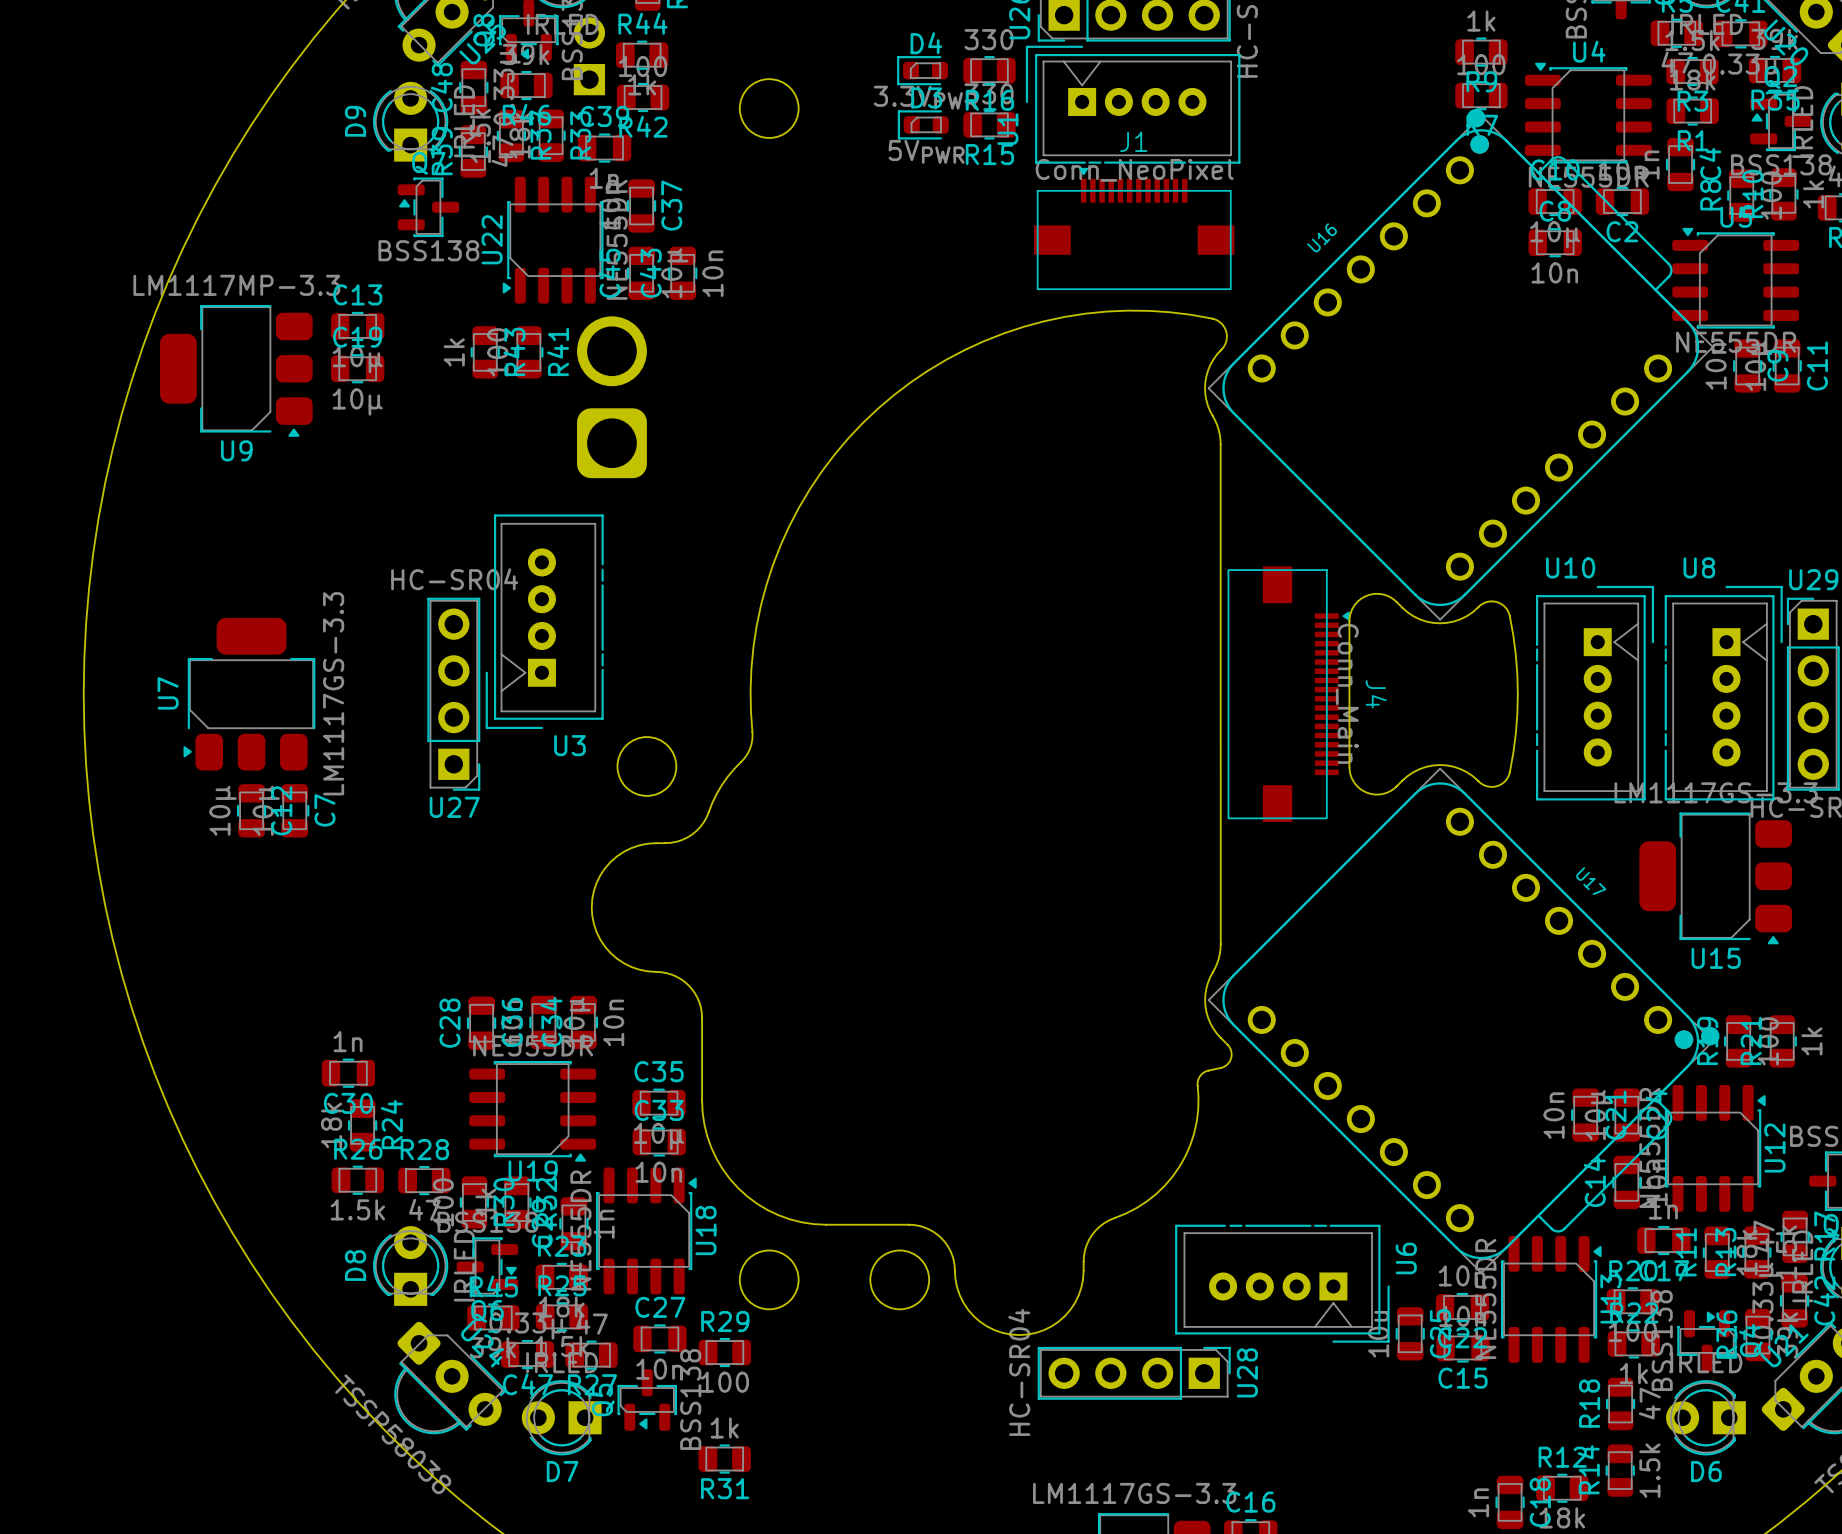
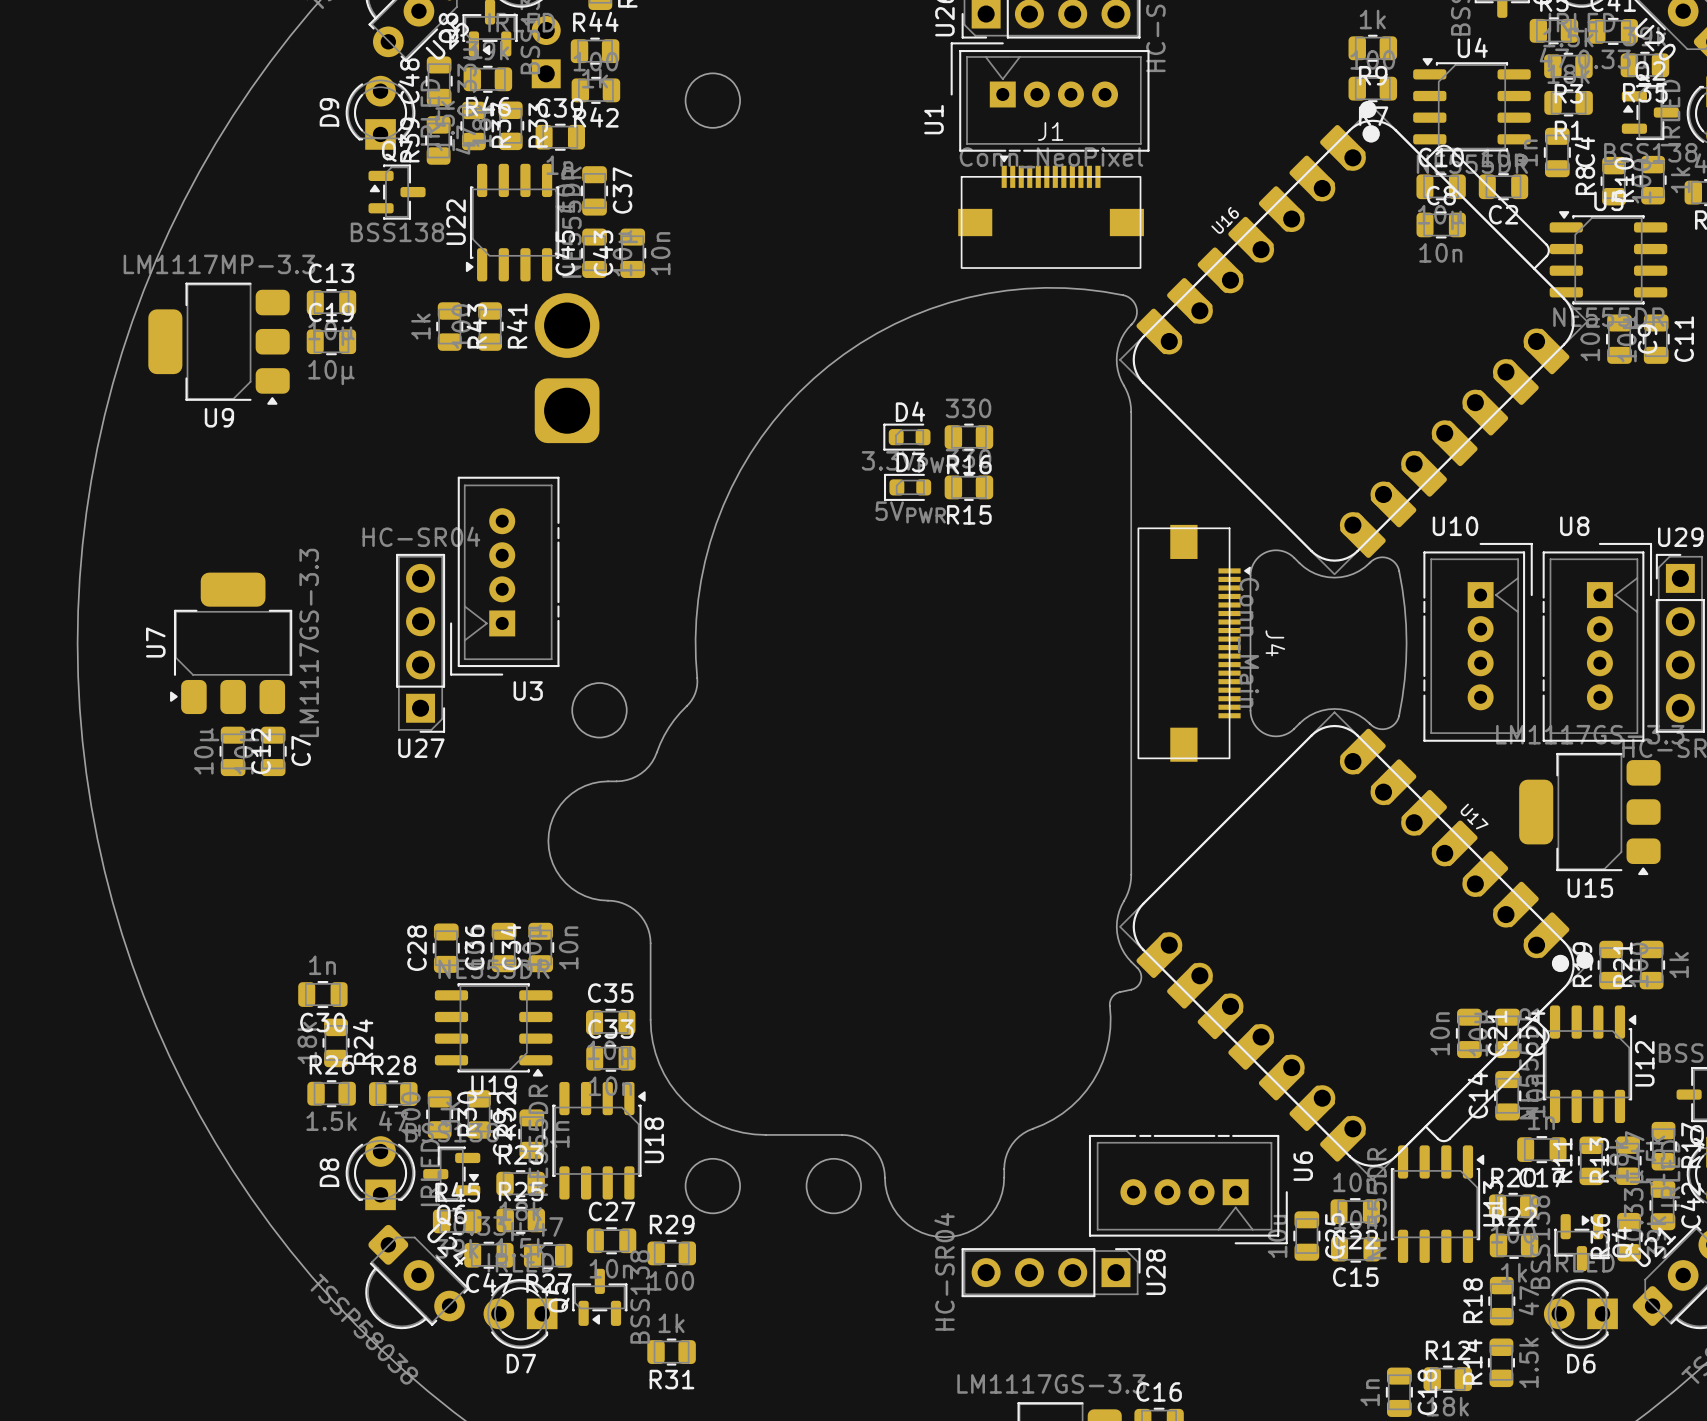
D4 position: (922, 70) -> (906, 437)
R16 position: (989, 70) -> (968, 437)
U16 footprint: [1207, 108, 1714, 621] -> [1119, 100, 1589, 576]
D3 position: (923, 124) -> (907, 487)
R15 position: (989, 124) -> (968, 487)
U17 footprint: [1207, 767, 1720, 1274] -> [1119, 711, 1594, 1181]

